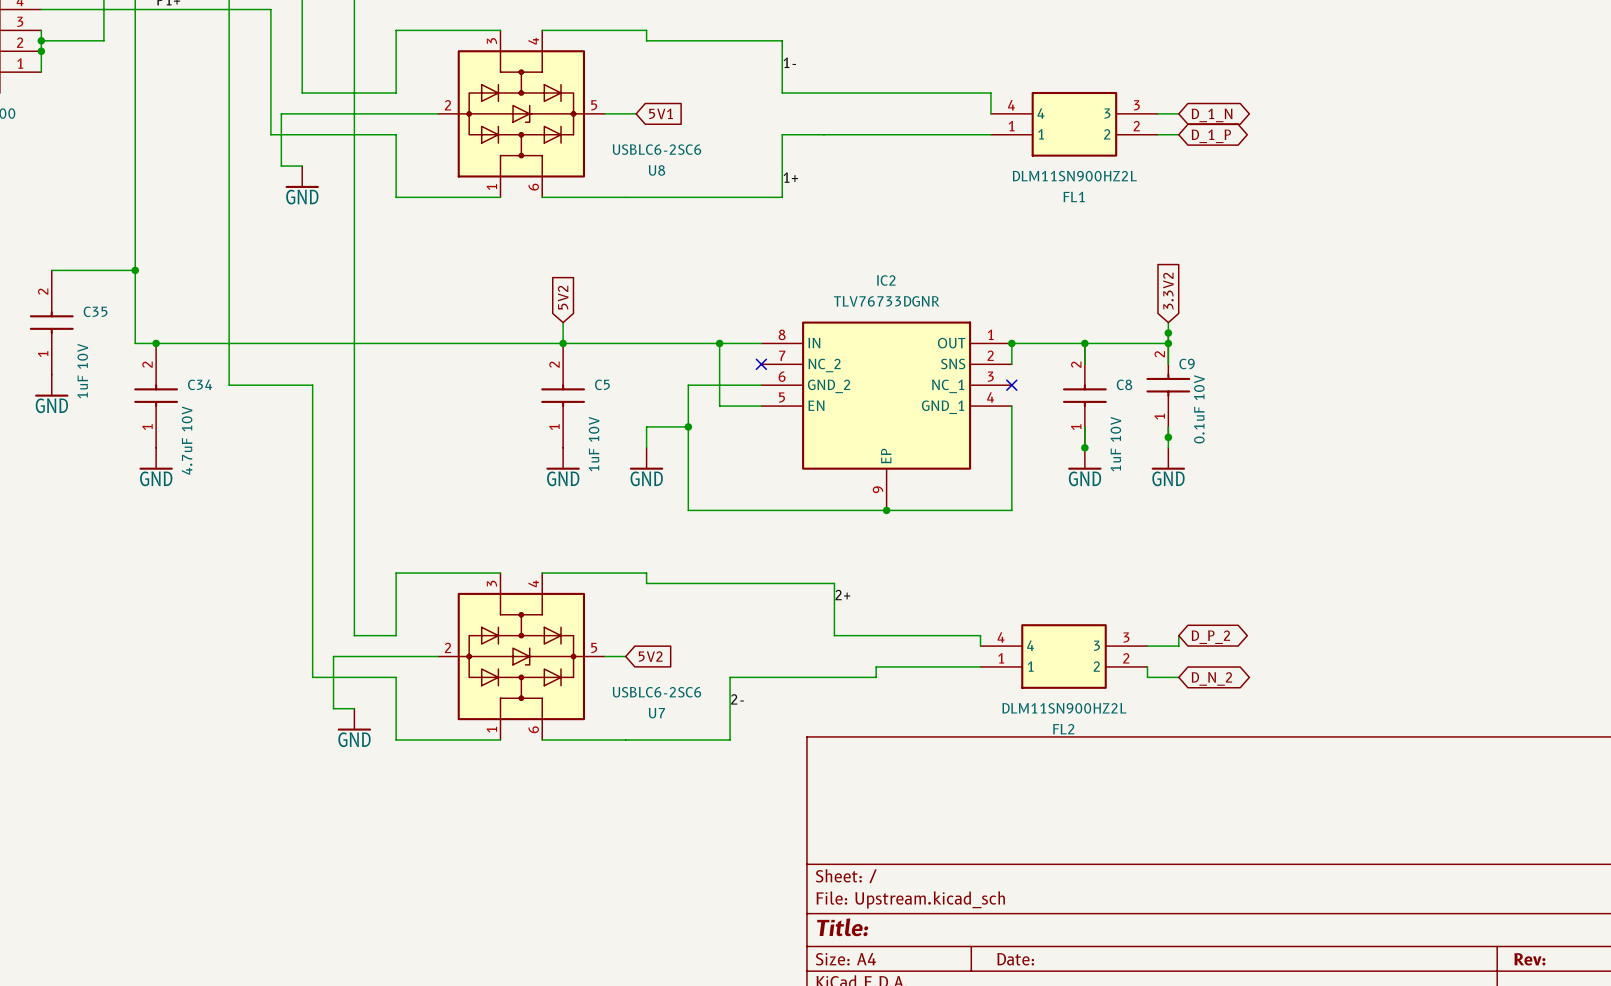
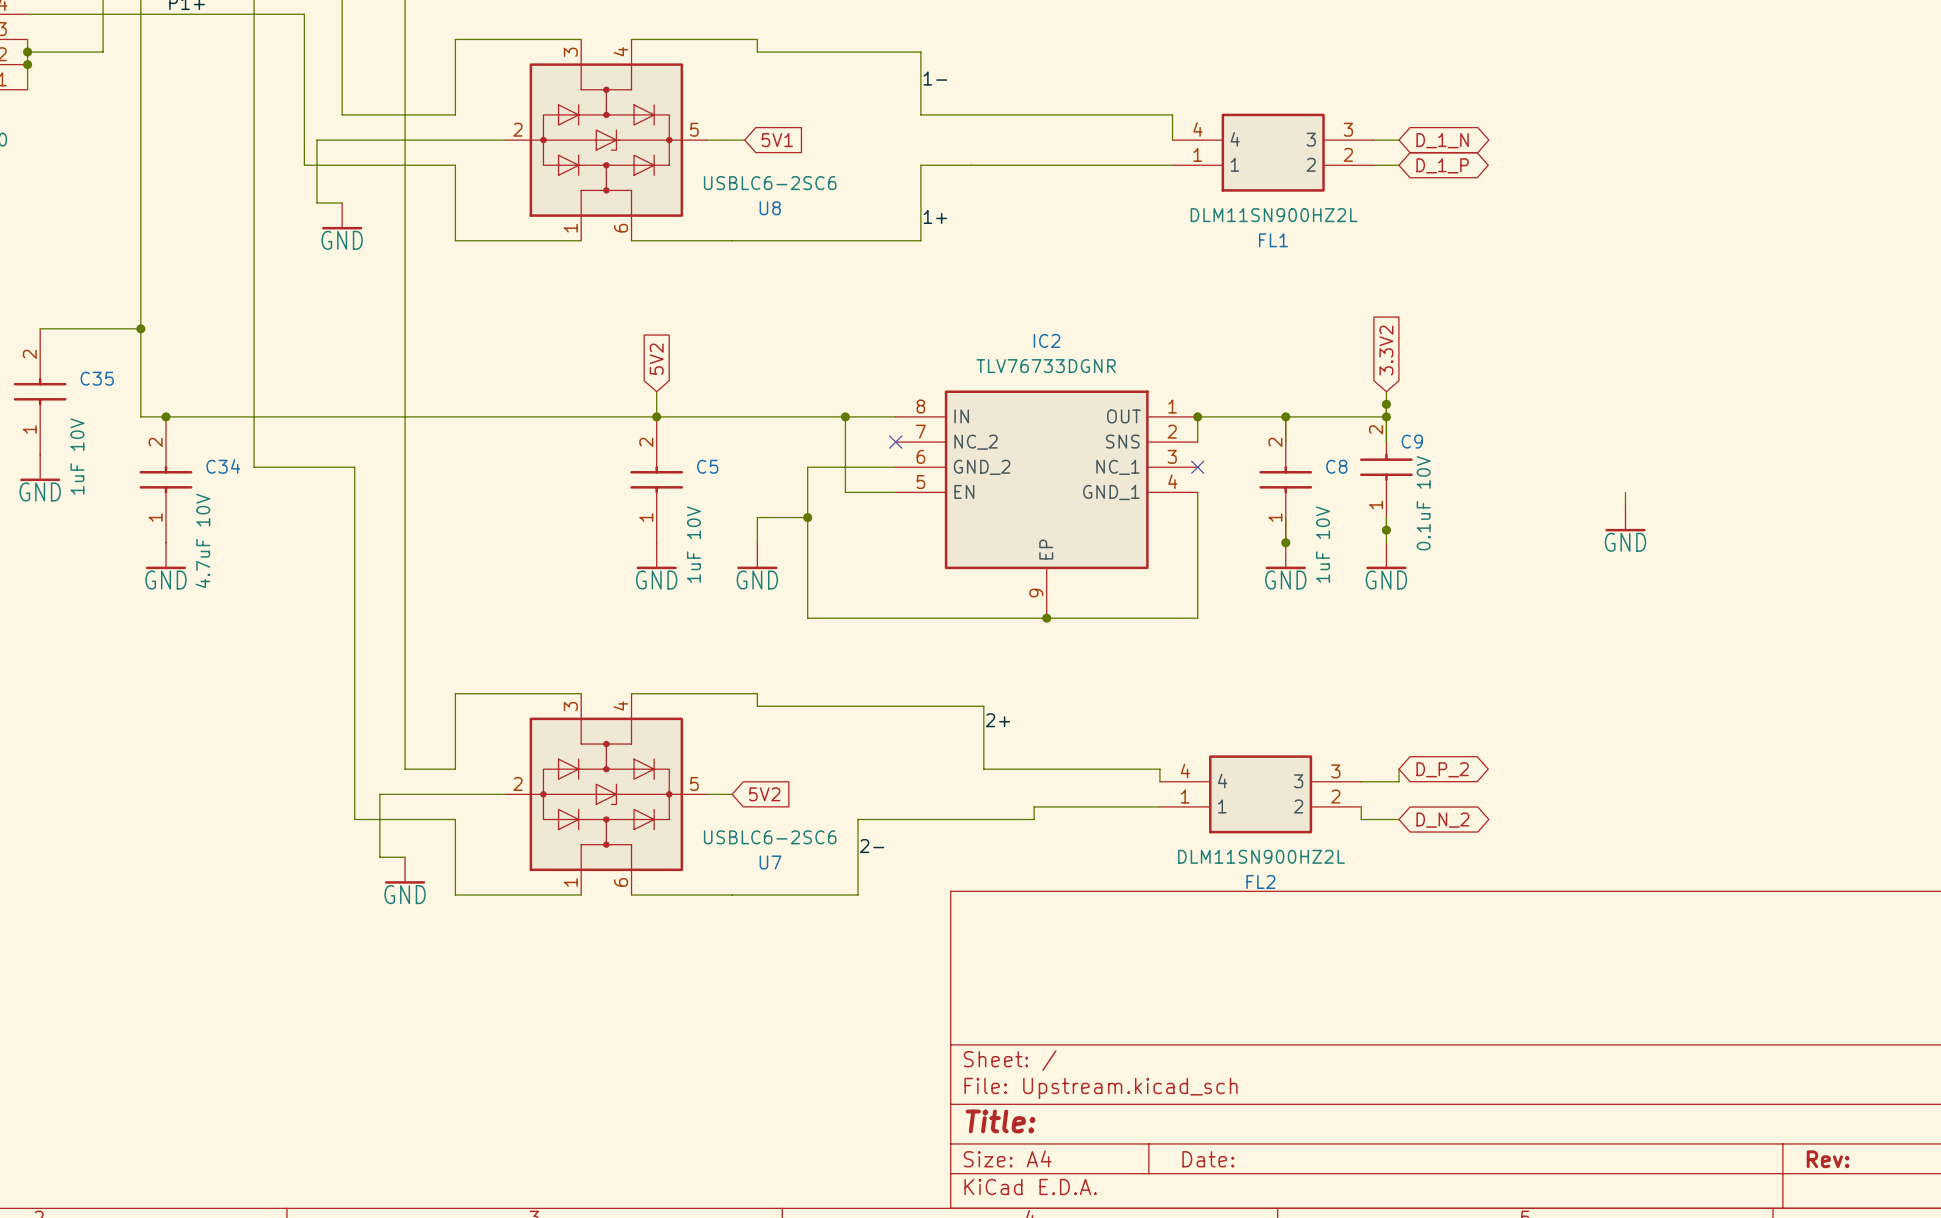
wire: none -> (1625, 492) (1625, 504)
power symbol: none -> GND (1625, 518)

